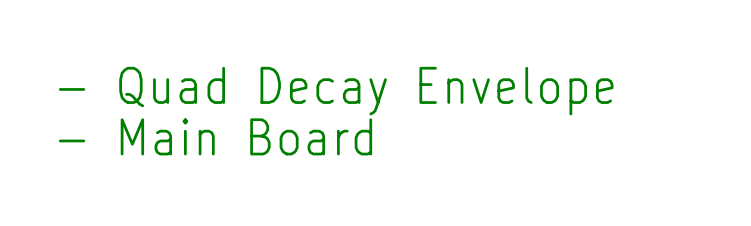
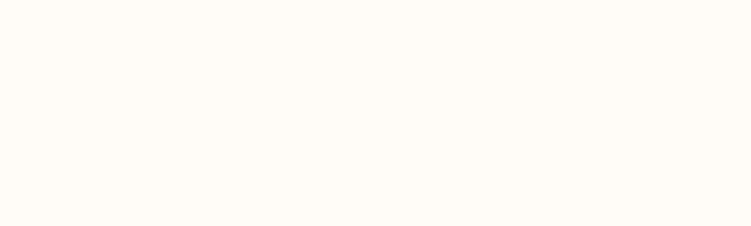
text: - Quad Decay Envelope (336, 91) -> none
text: - Main Board (215, 136) -> none

